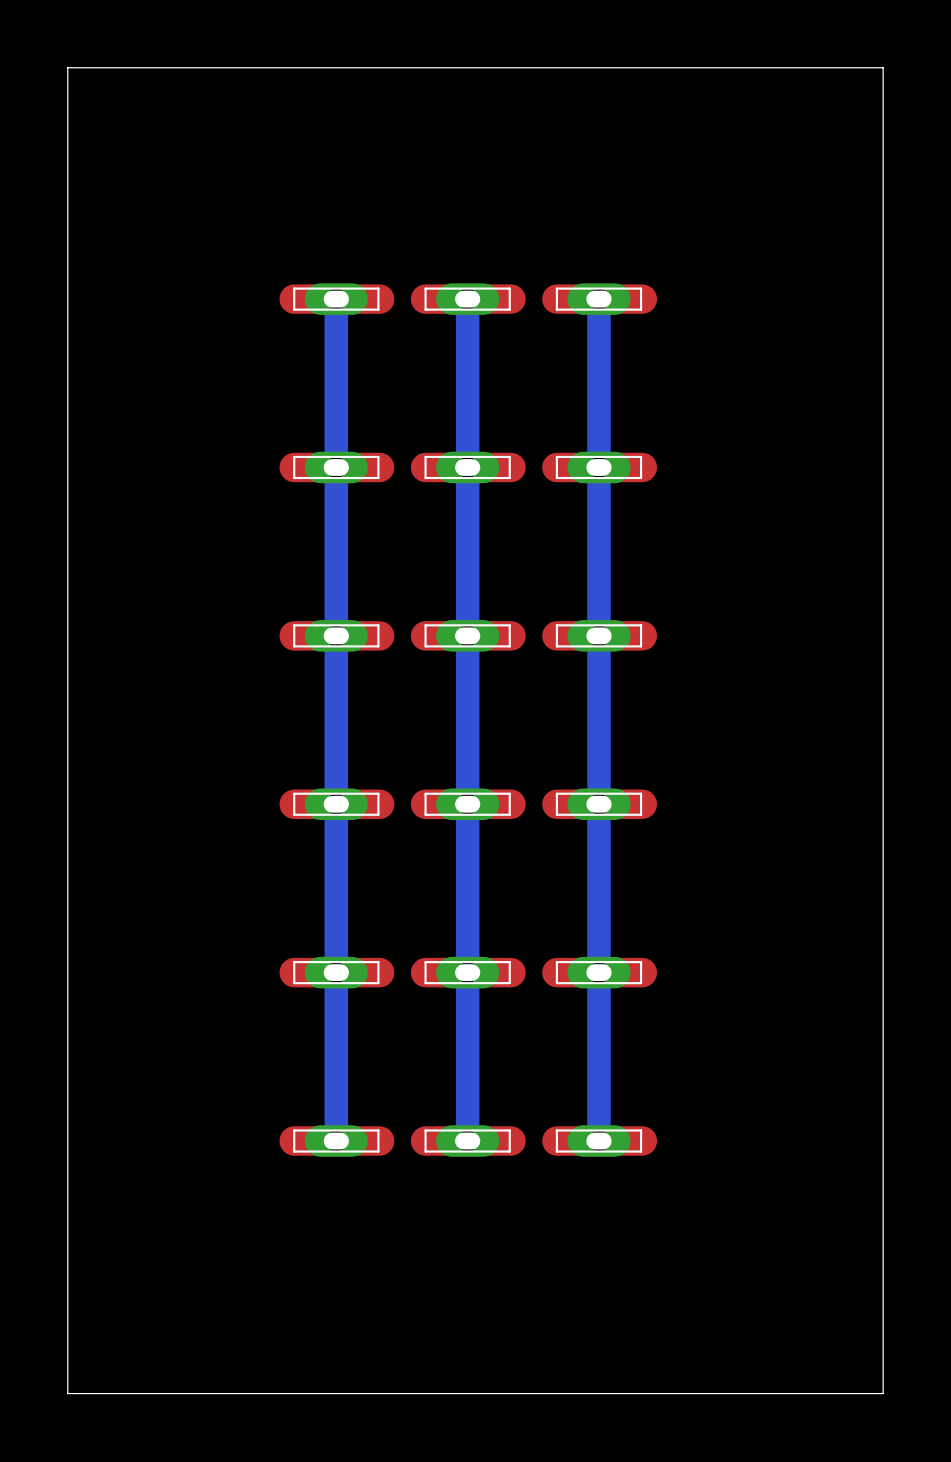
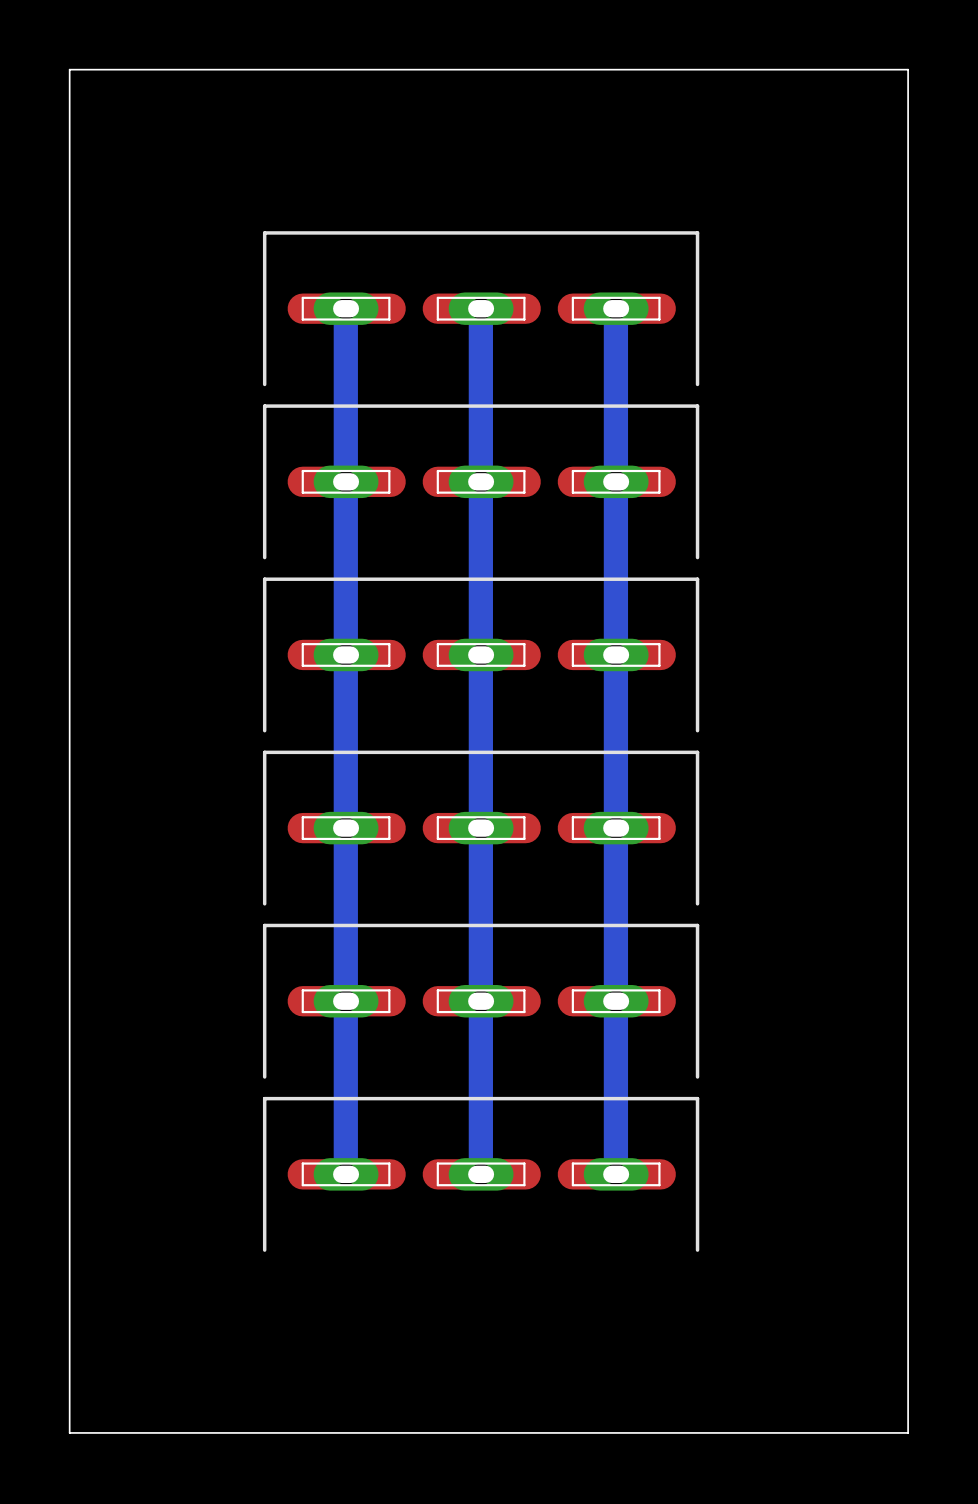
part footprint: [279, 283, 658, 315] -> [262, 231, 700, 387]
part footprint: [279, 451, 658, 484] -> [262, 404, 700, 560]
part footprint: [279, 620, 658, 652] -> [262, 577, 700, 733]
part footprint: [279, 788, 658, 821] -> [262, 750, 700, 906]
part footprint: [279, 956, 658, 989] -> [262, 923, 700, 1079]
part footprint: [279, 1125, 658, 1157] -> [262, 1096, 700, 1252]

